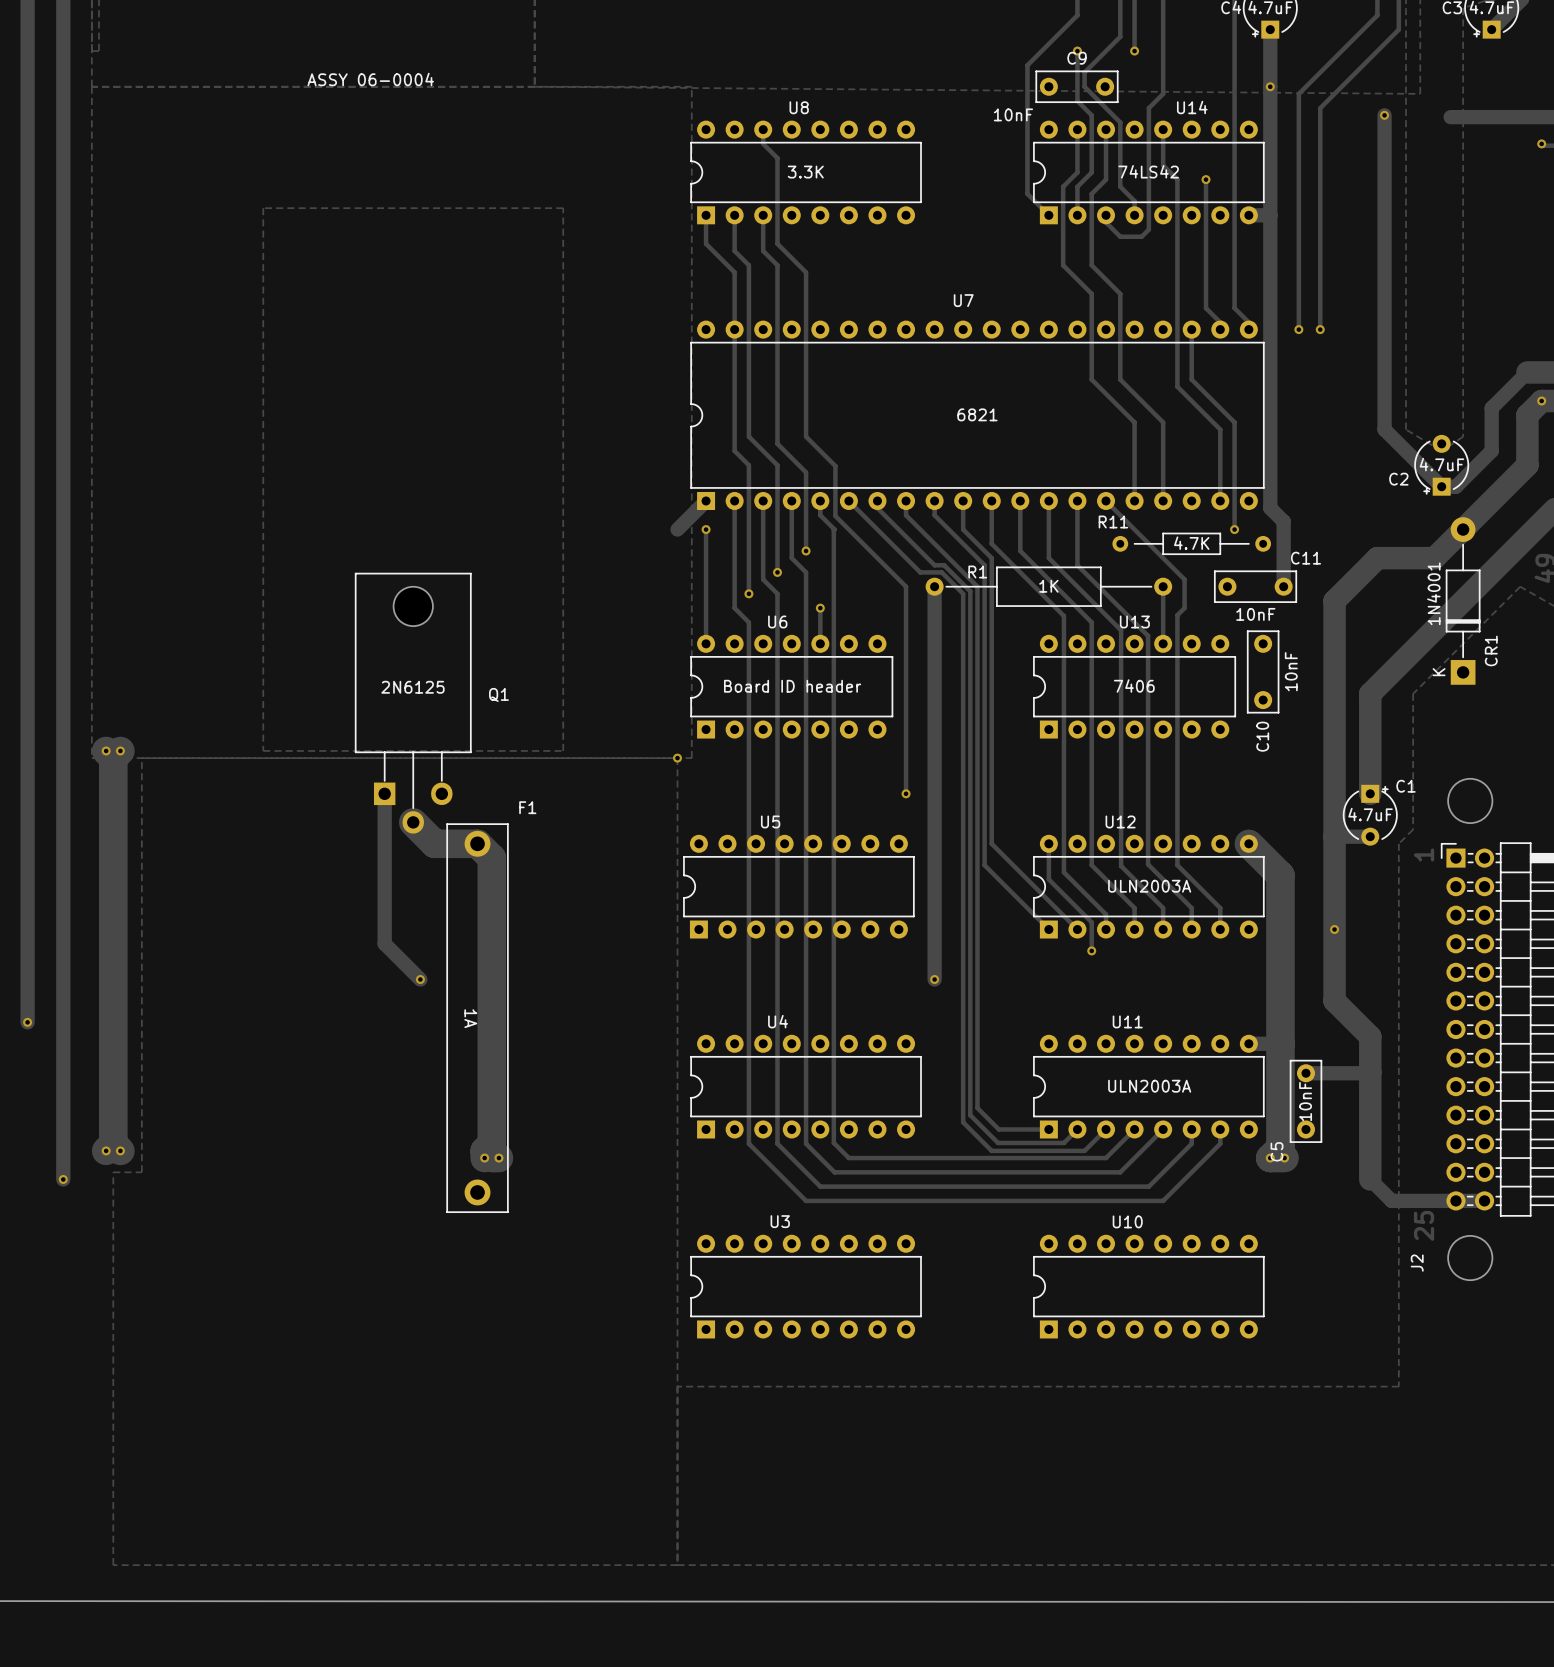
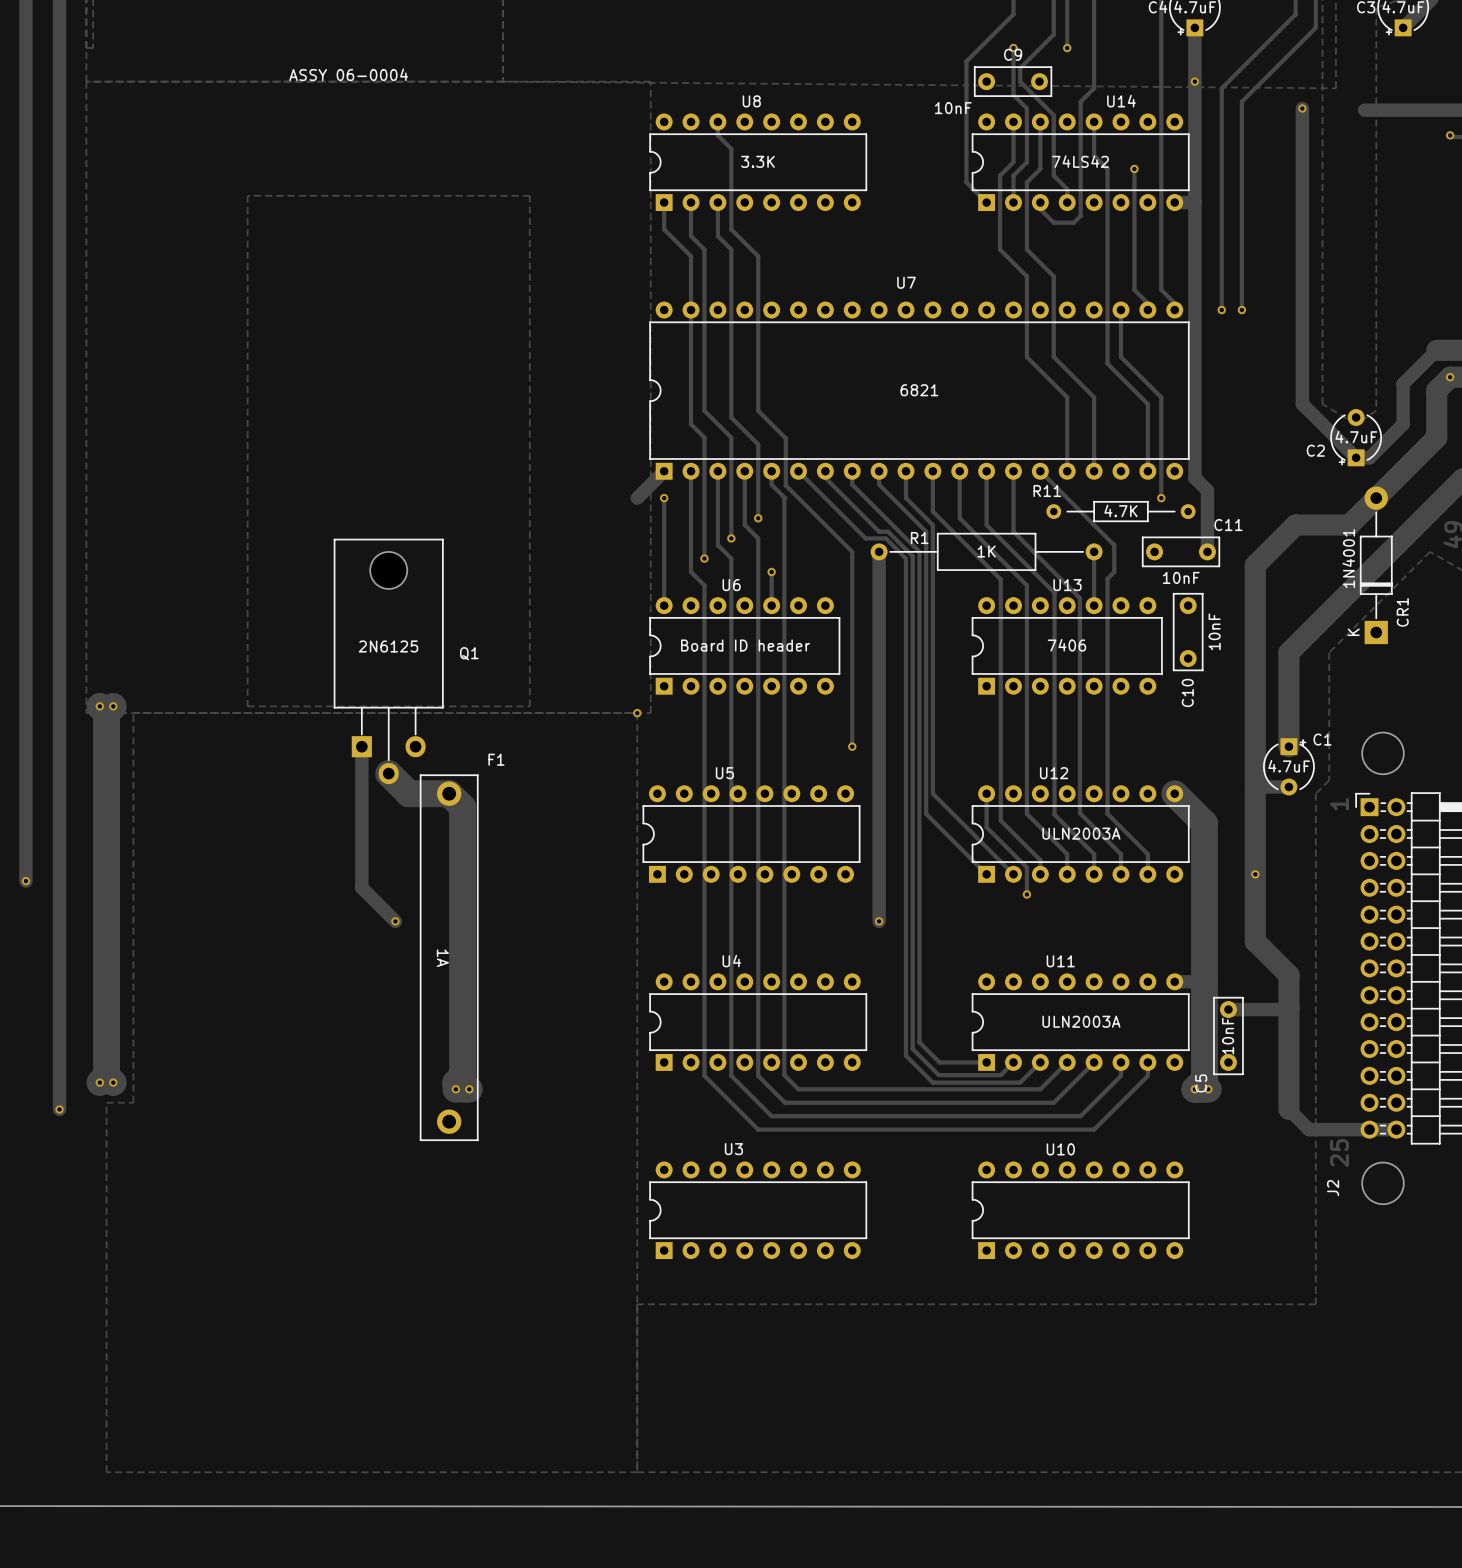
track: (27, 936) (27, 1022) -> none
via: none -> (25, 881)
via: (27, 1022) -> none

